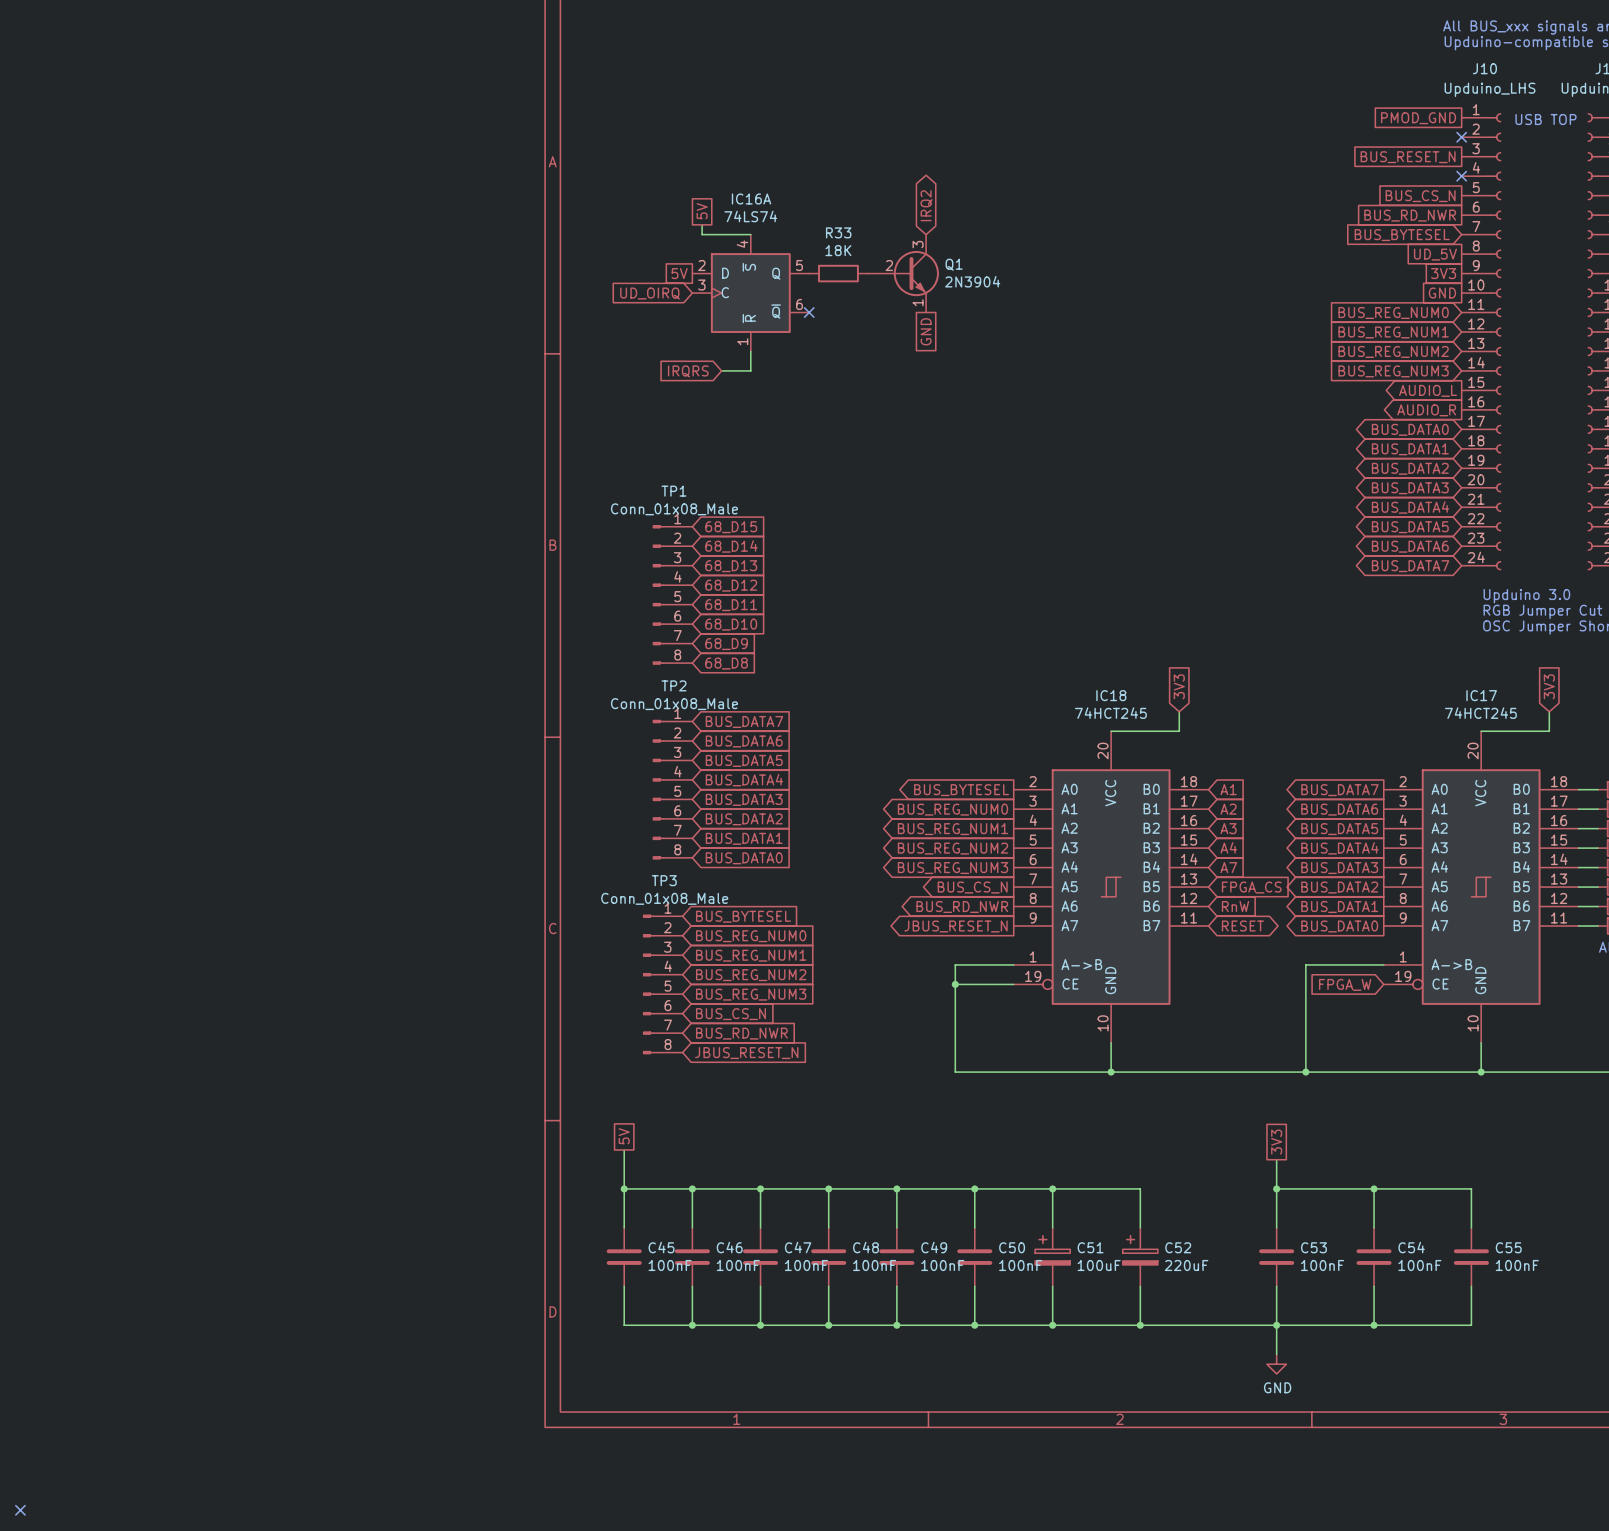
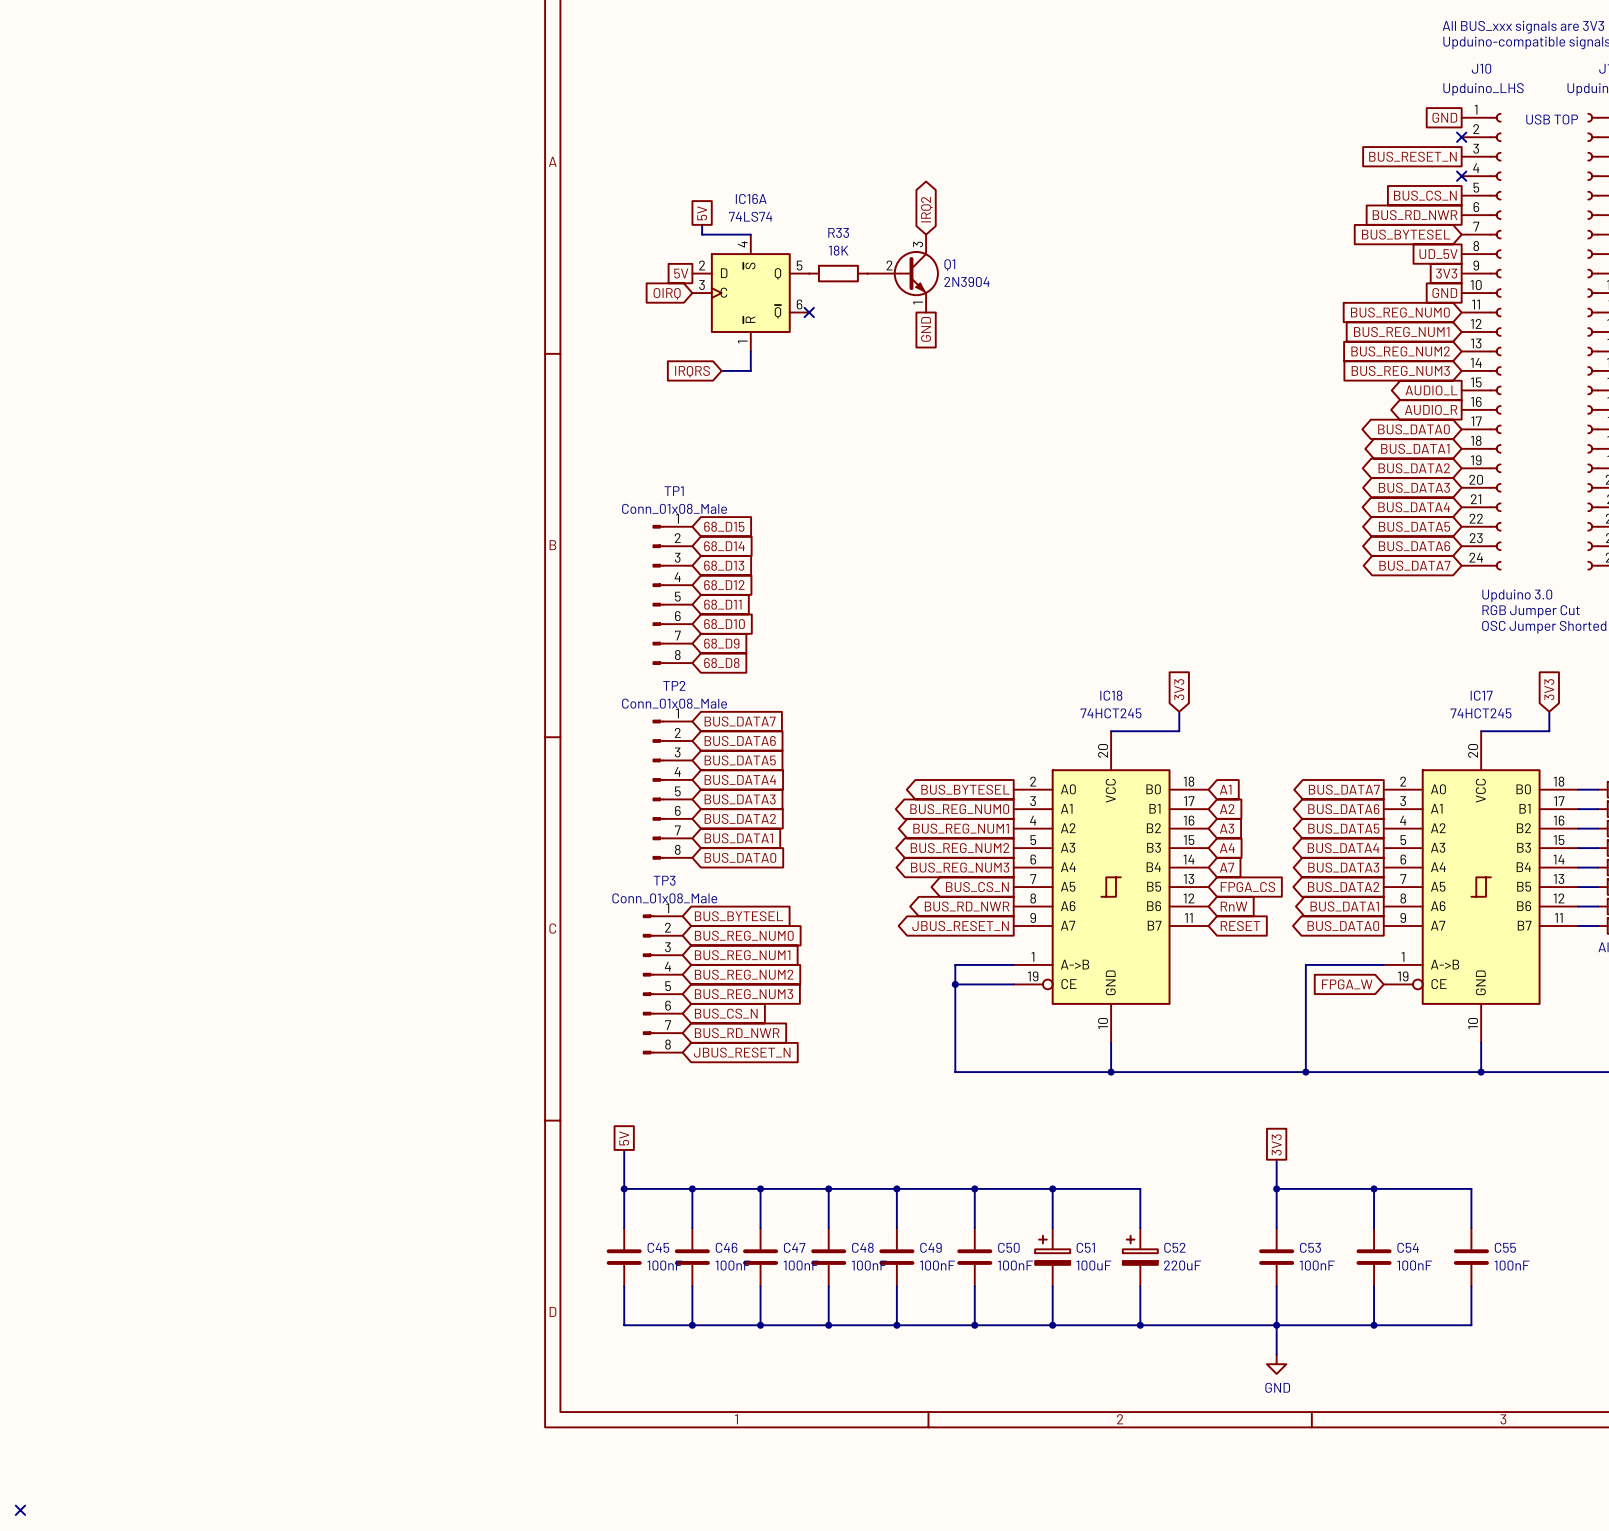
global label: PMOD_GND (1418, 118) -> GND (1444, 117)
global label: UD_OIRQ (650, 293) -> OIRQ (667, 293)
global label shape: bidirectional (1242, 926) -> input (1240, 926)

